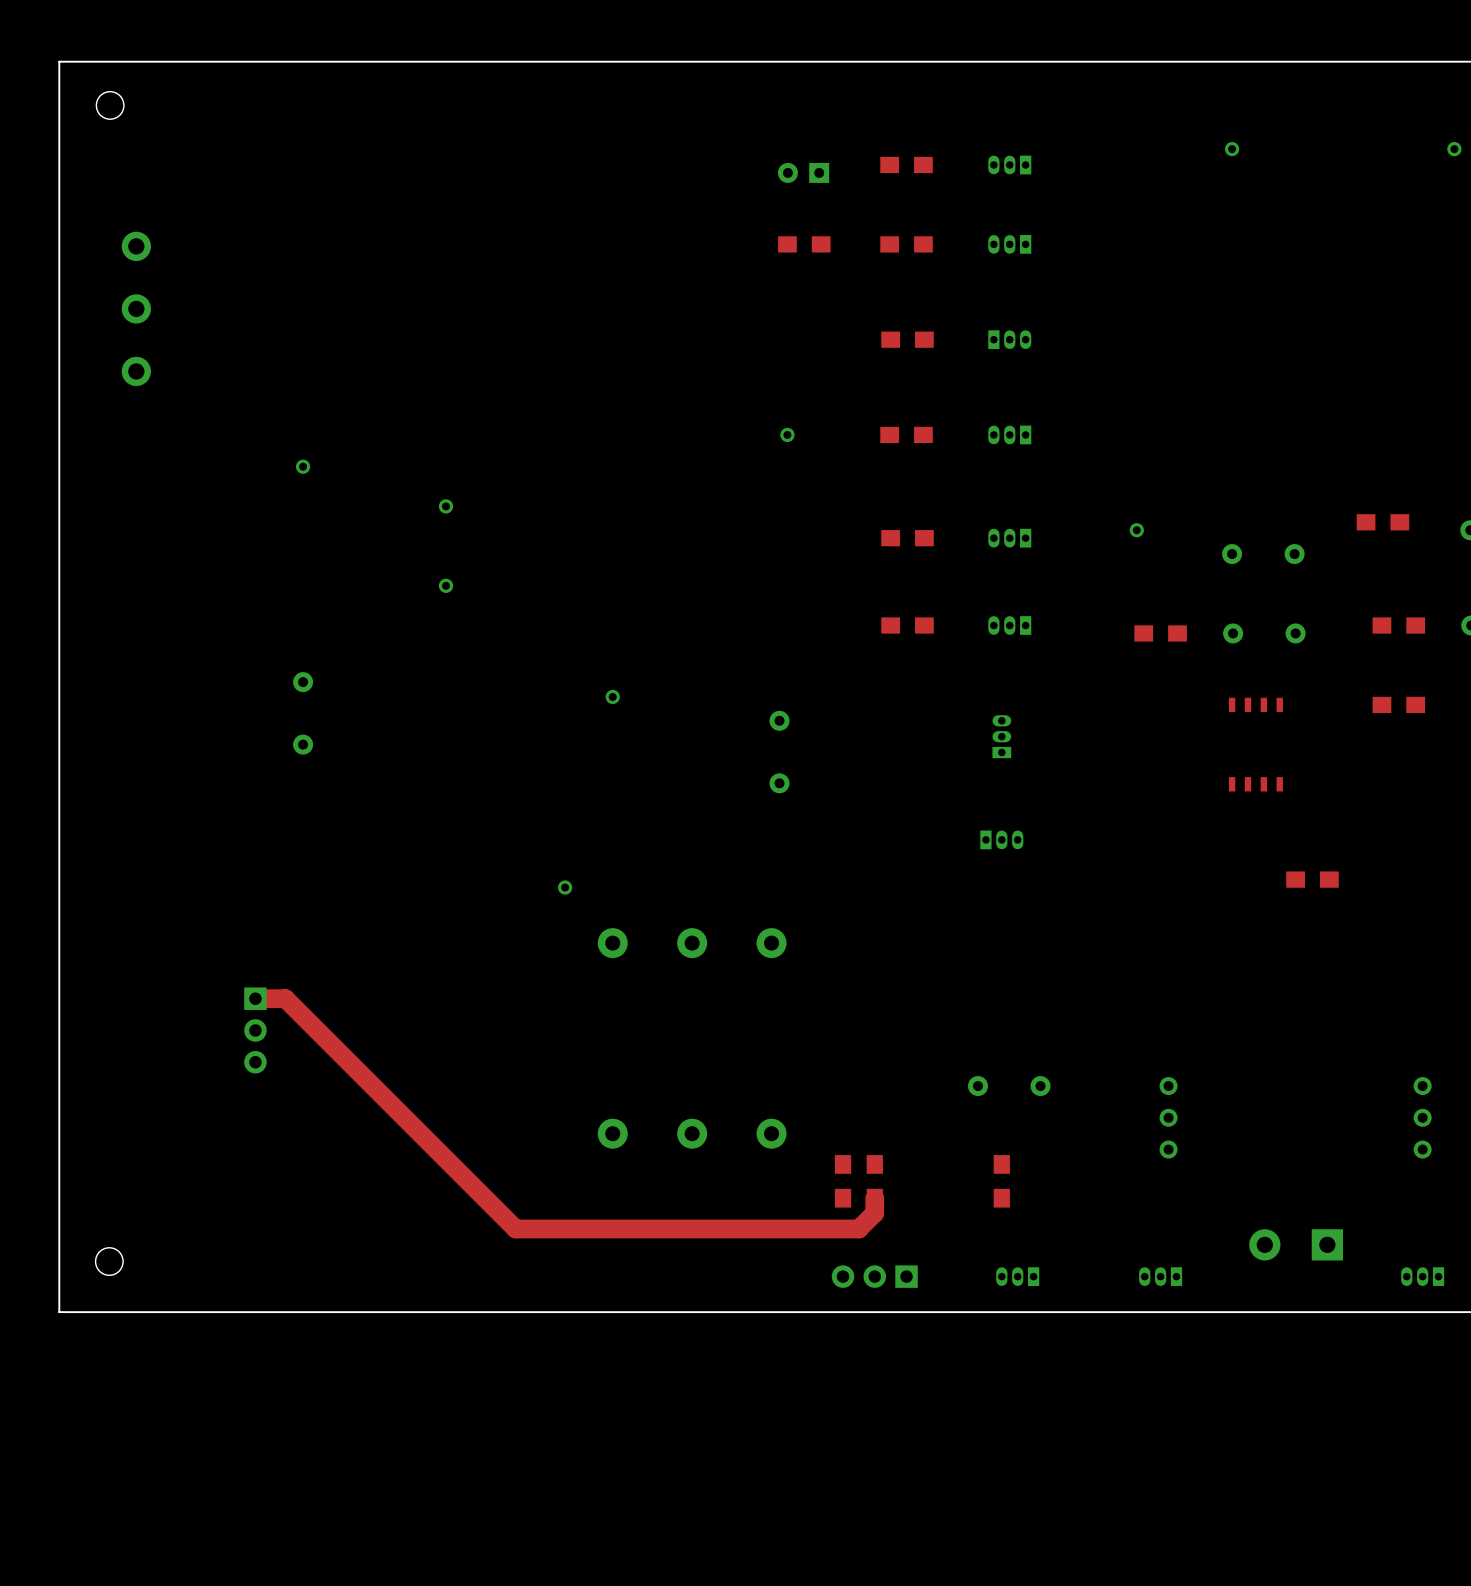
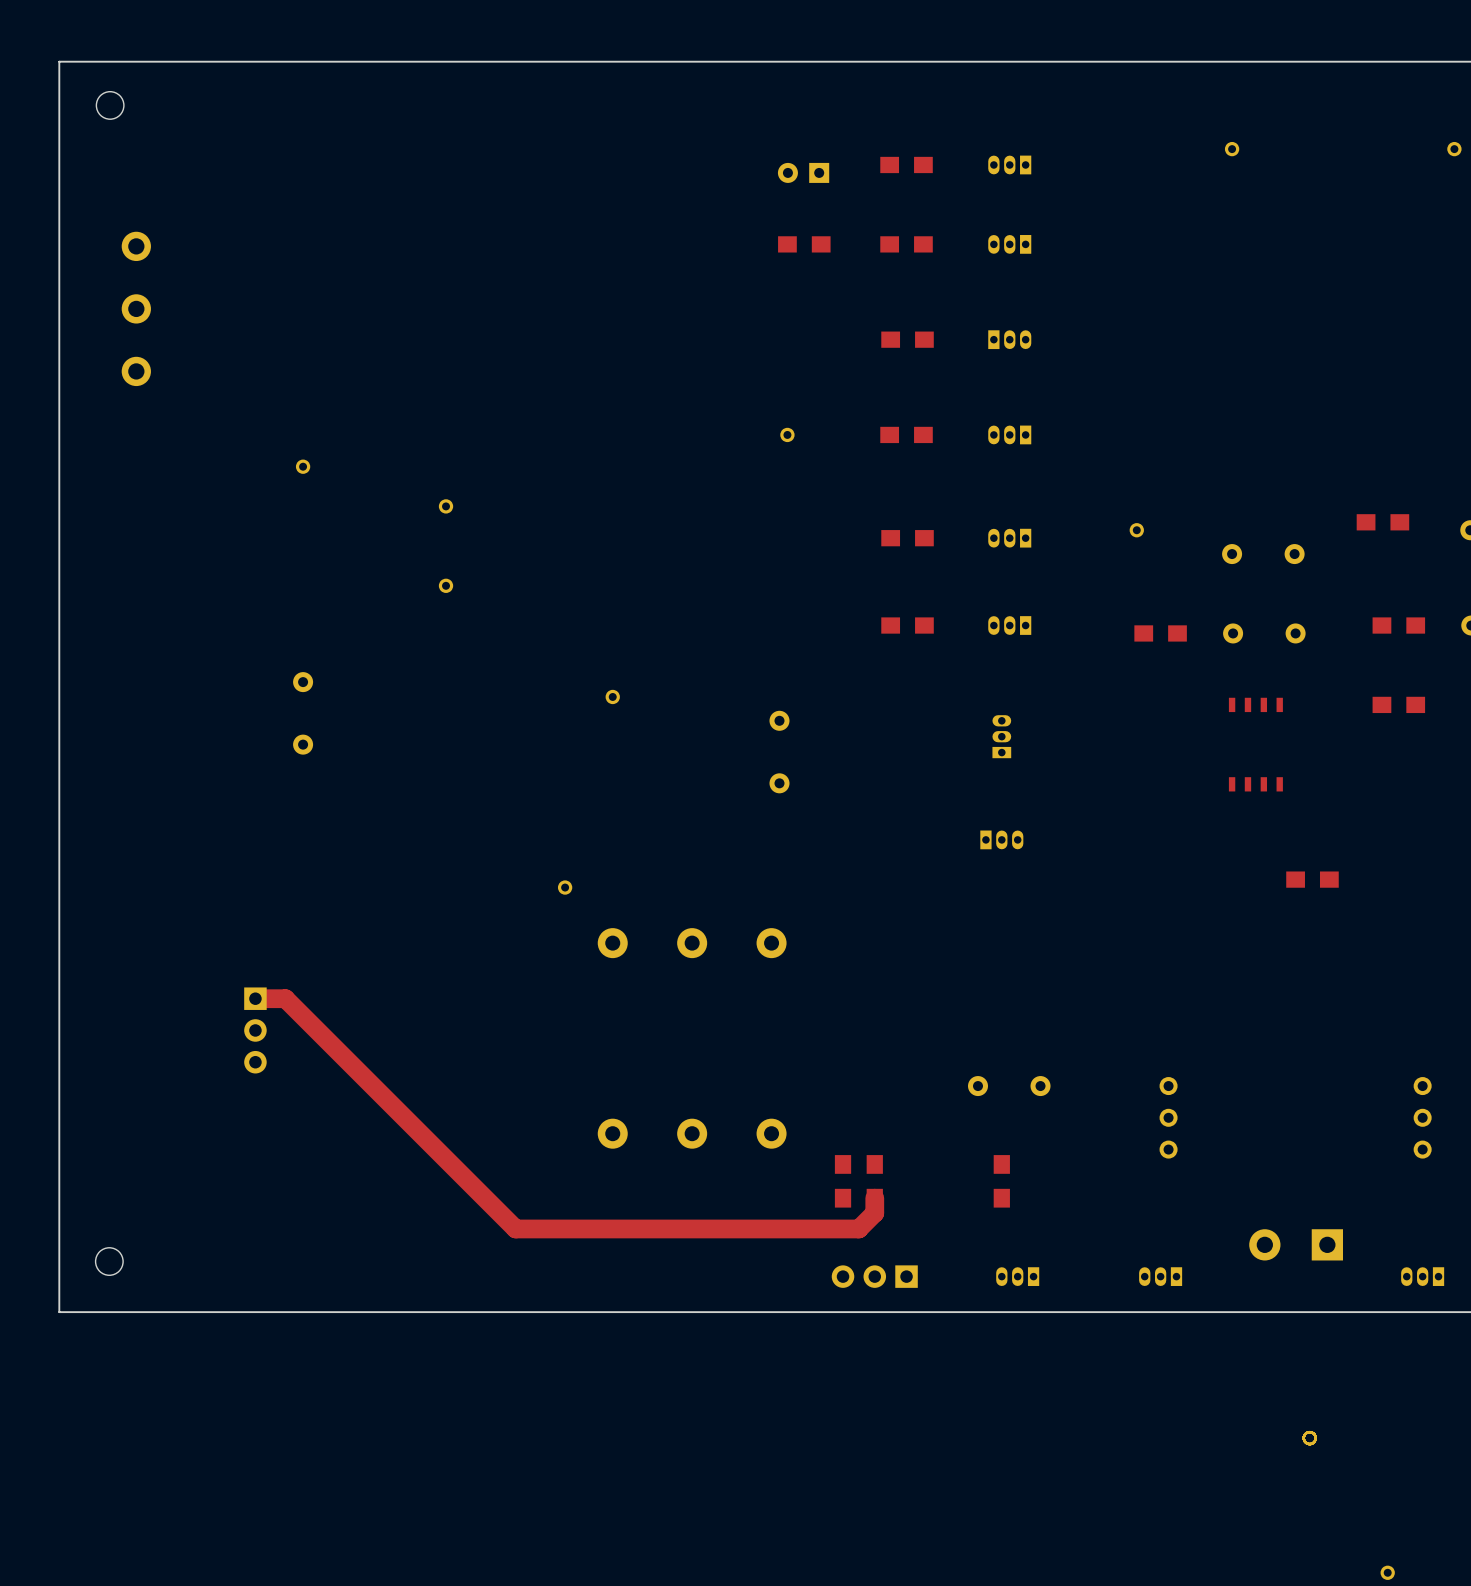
part: none -> (1309, 1438)
part: none -> (1387, 1572)

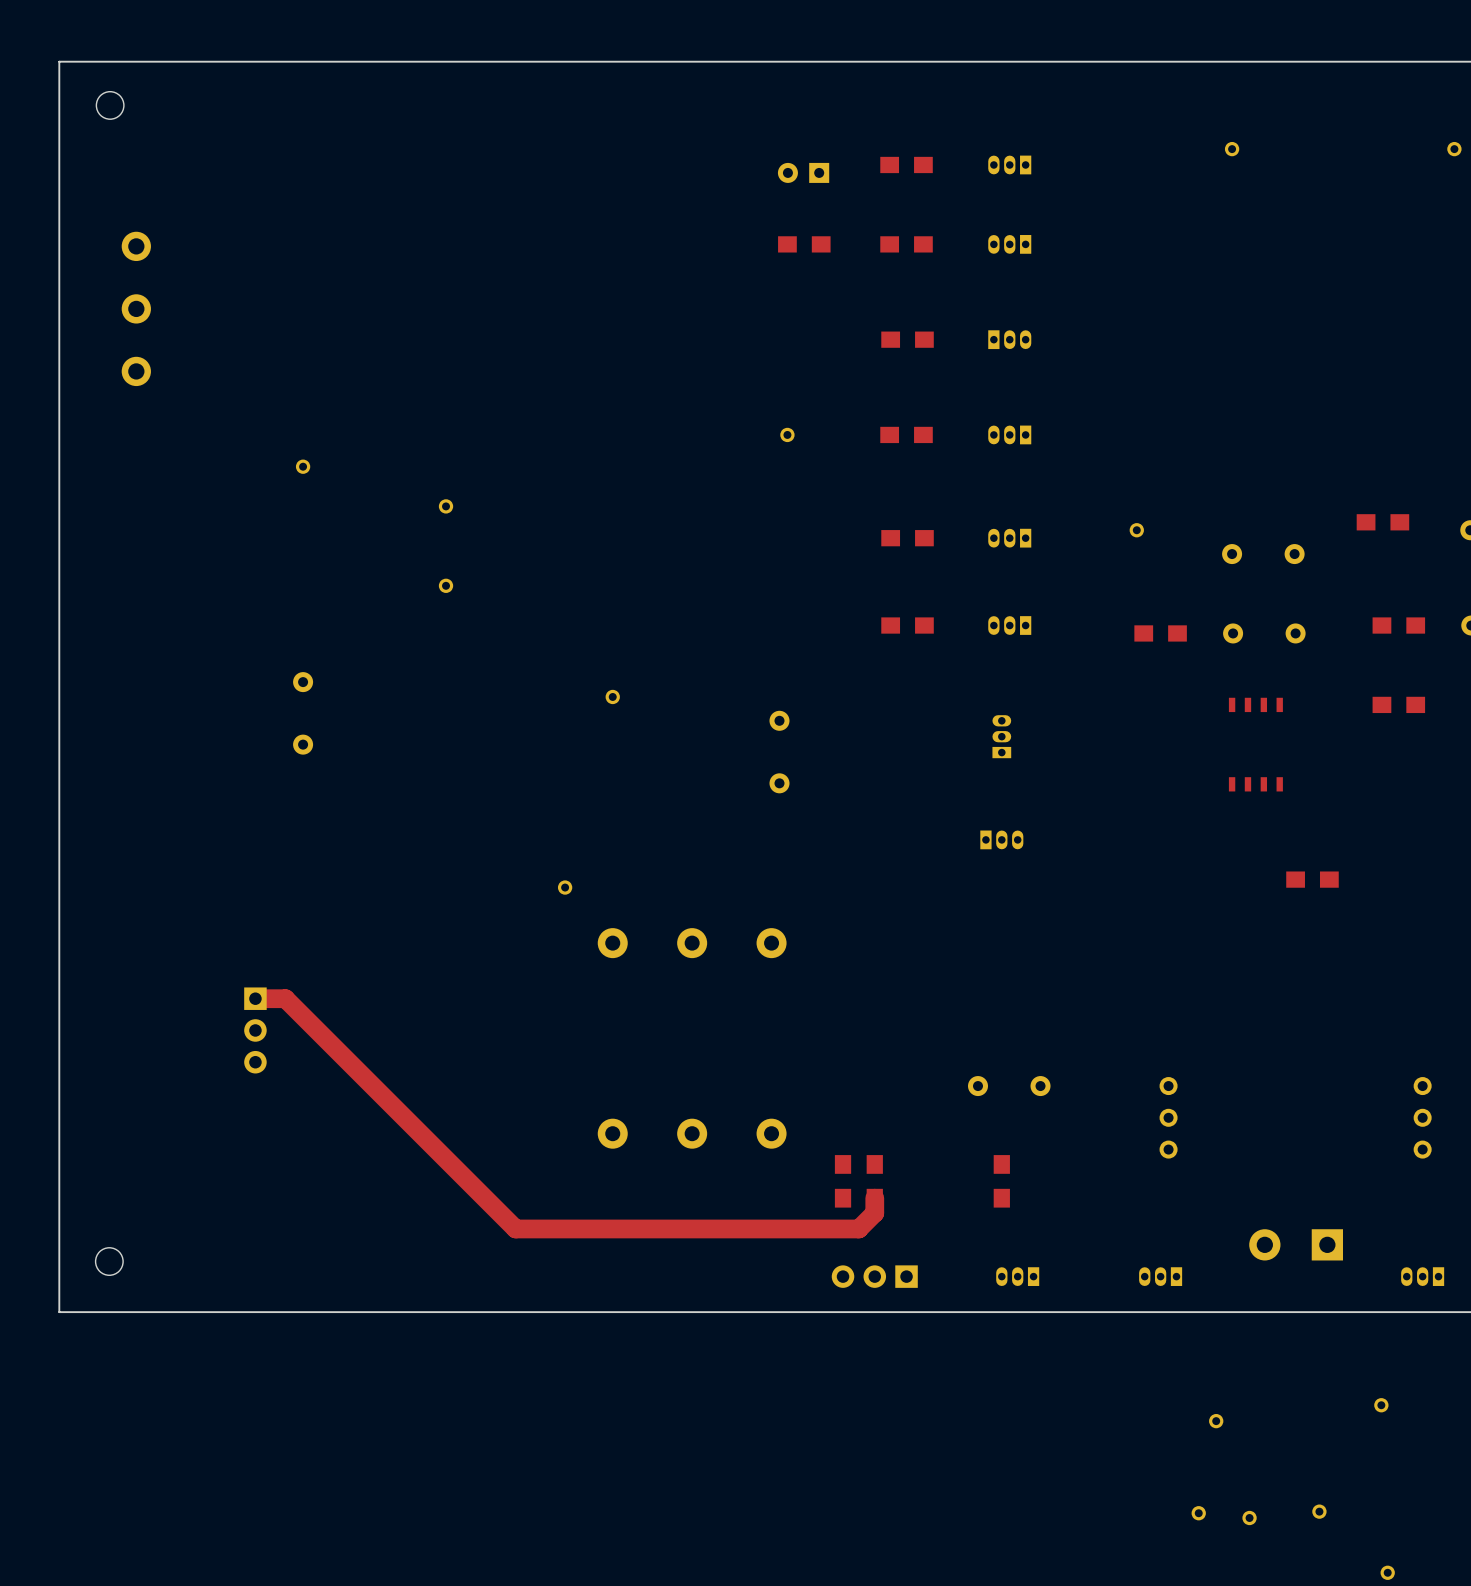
part: none -> (1381, 1405)
part: none -> (1216, 1421)
part: (1309, 1438) -> none
part: none -> (1319, 1511)
part: none -> (1198, 1513)
part: none -> (1249, 1517)

